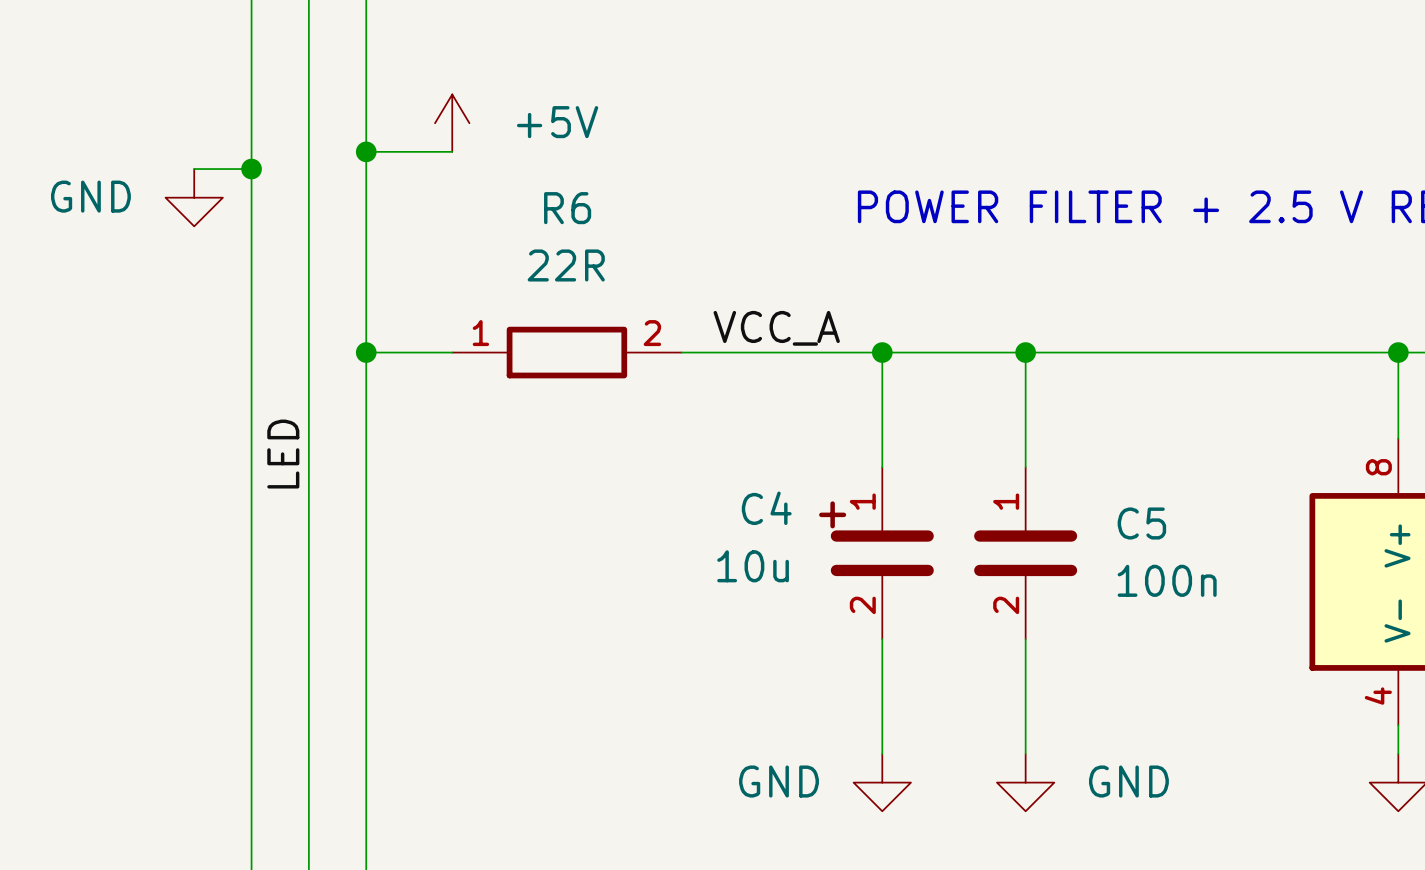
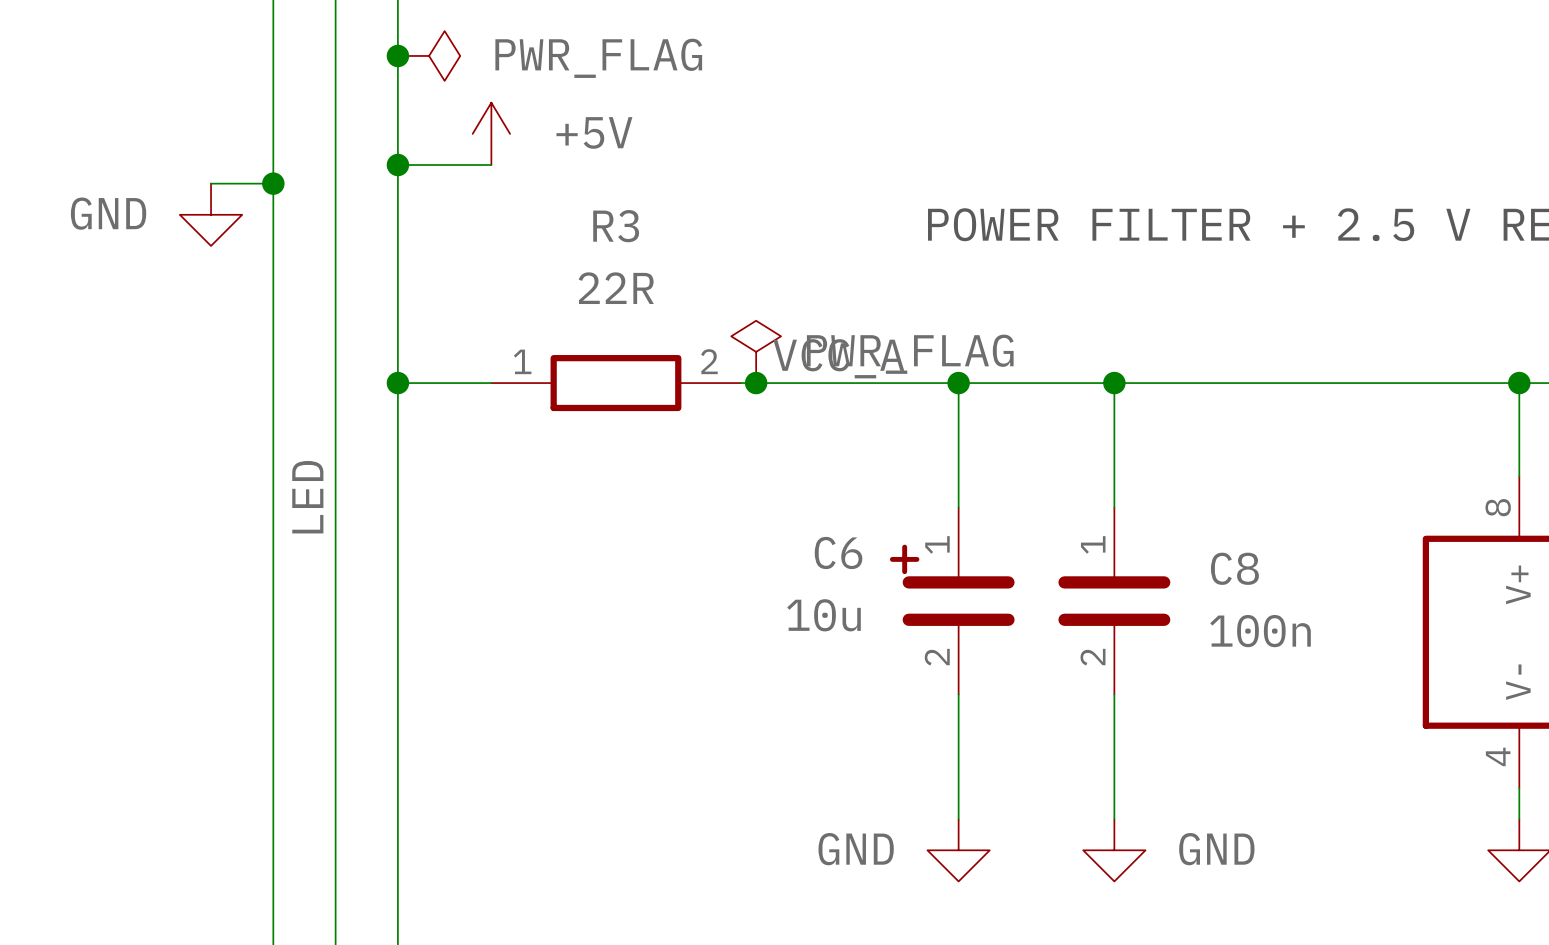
junction: none -> (397, 55)
power symbol: none -> PWR_FLAG (429, 55)
R6 name: R6 (567, 208) -> R3 (616, 226)
power symbol: none -> PWR_FLAG (756, 351)
junction: none -> (756, 383)
C4 name: C4 (766, 508) -> C6 (838, 552)
C5 name: C5 (1141, 523) -> C8 (1234, 568)

